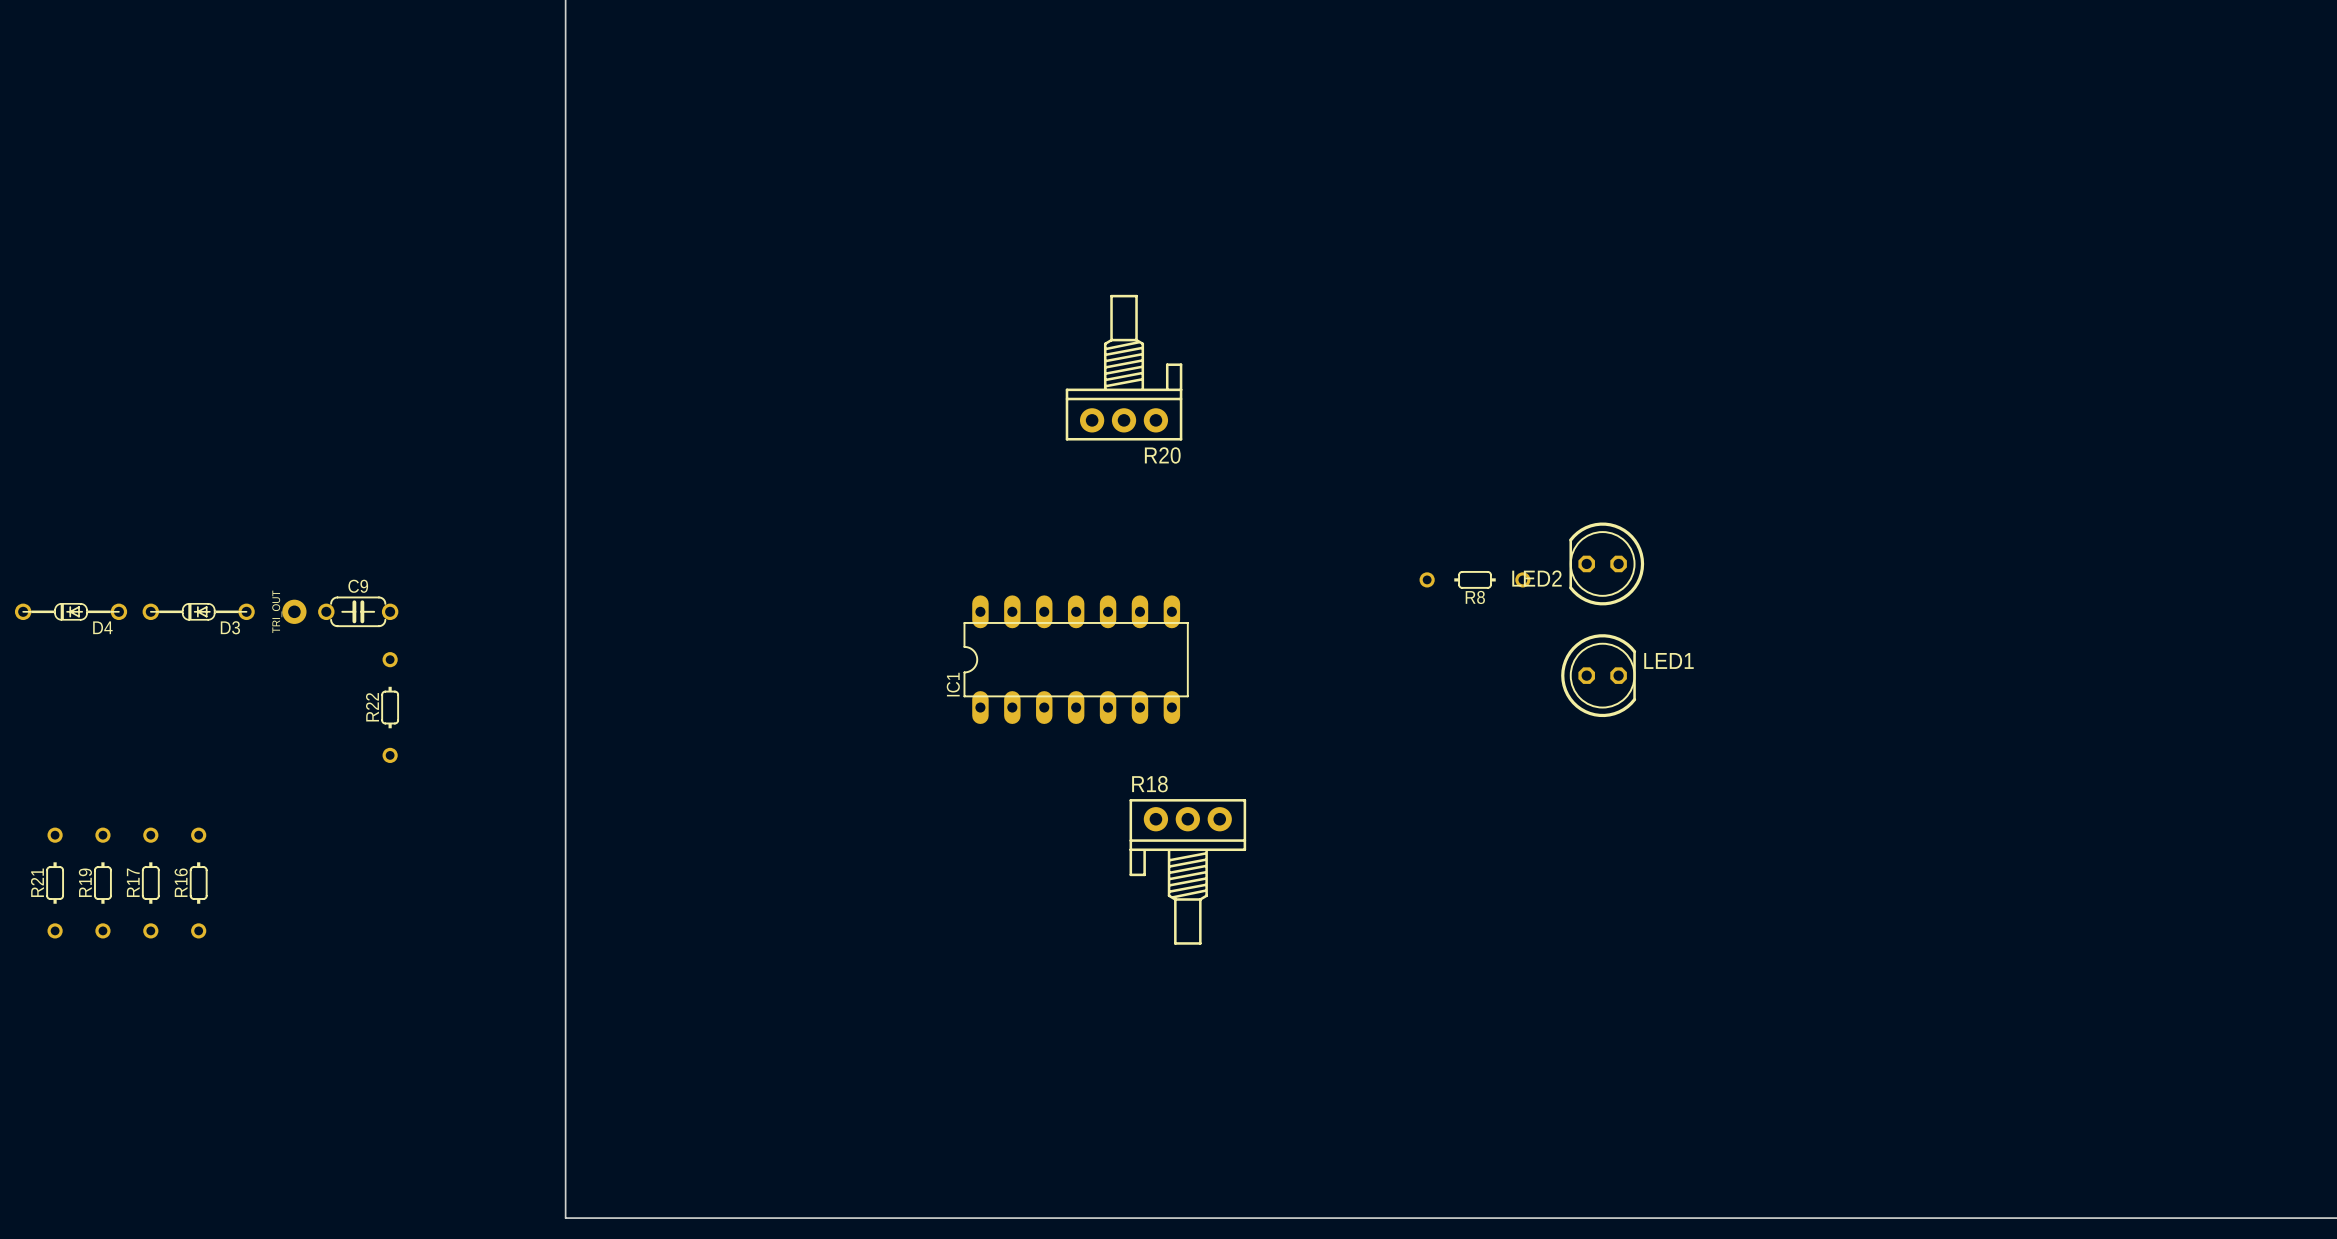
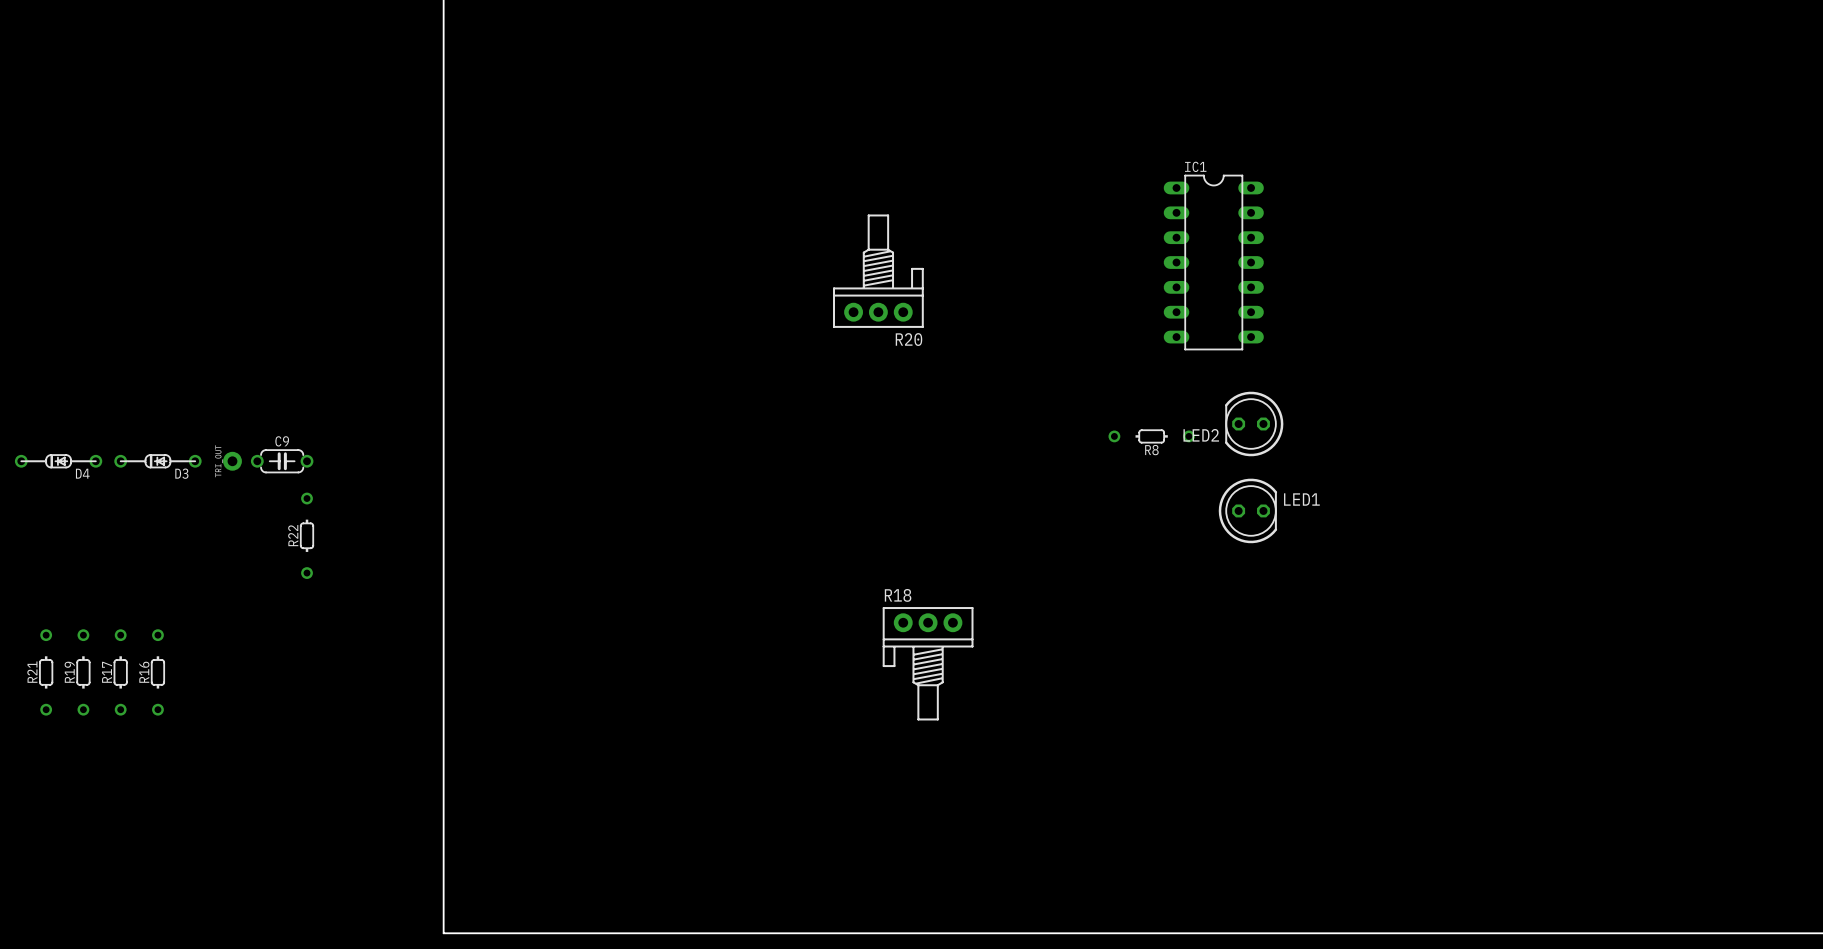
IC1 rotation: 0° (1076, 659) -> 90° clockwise (1213, 262)
IC1 position: (1076, 659) -> (1213, 262)

